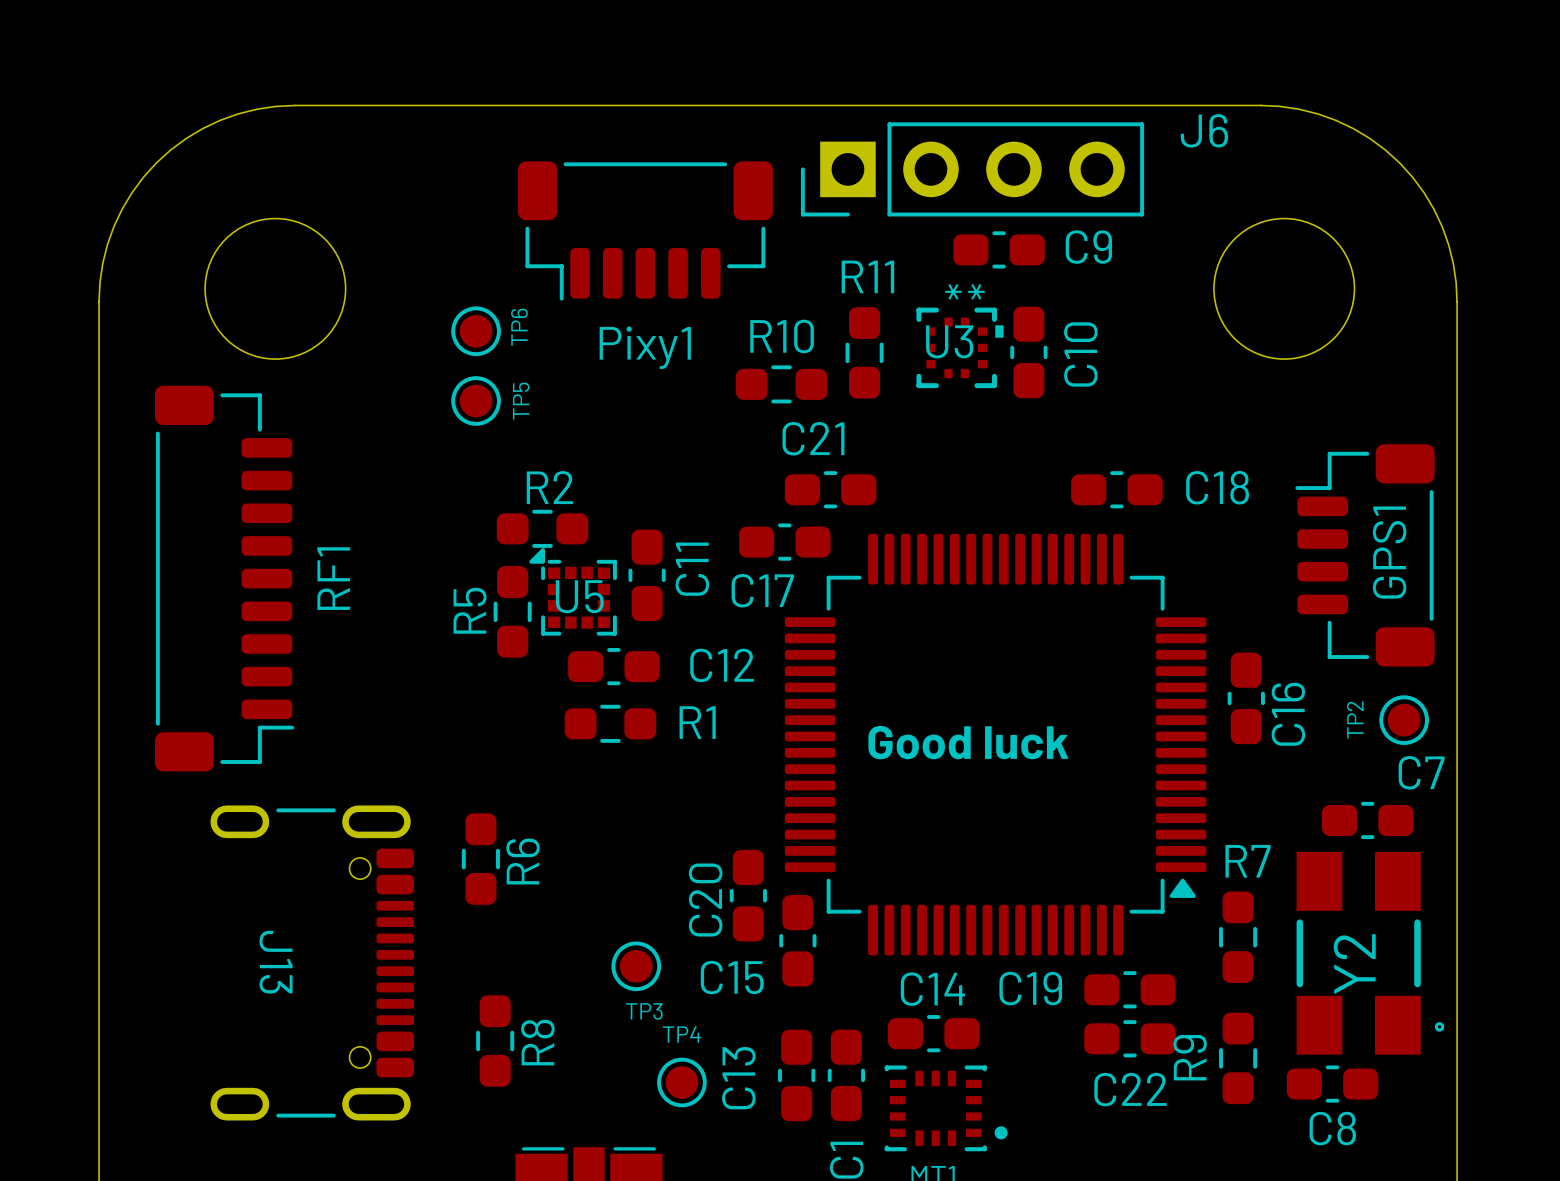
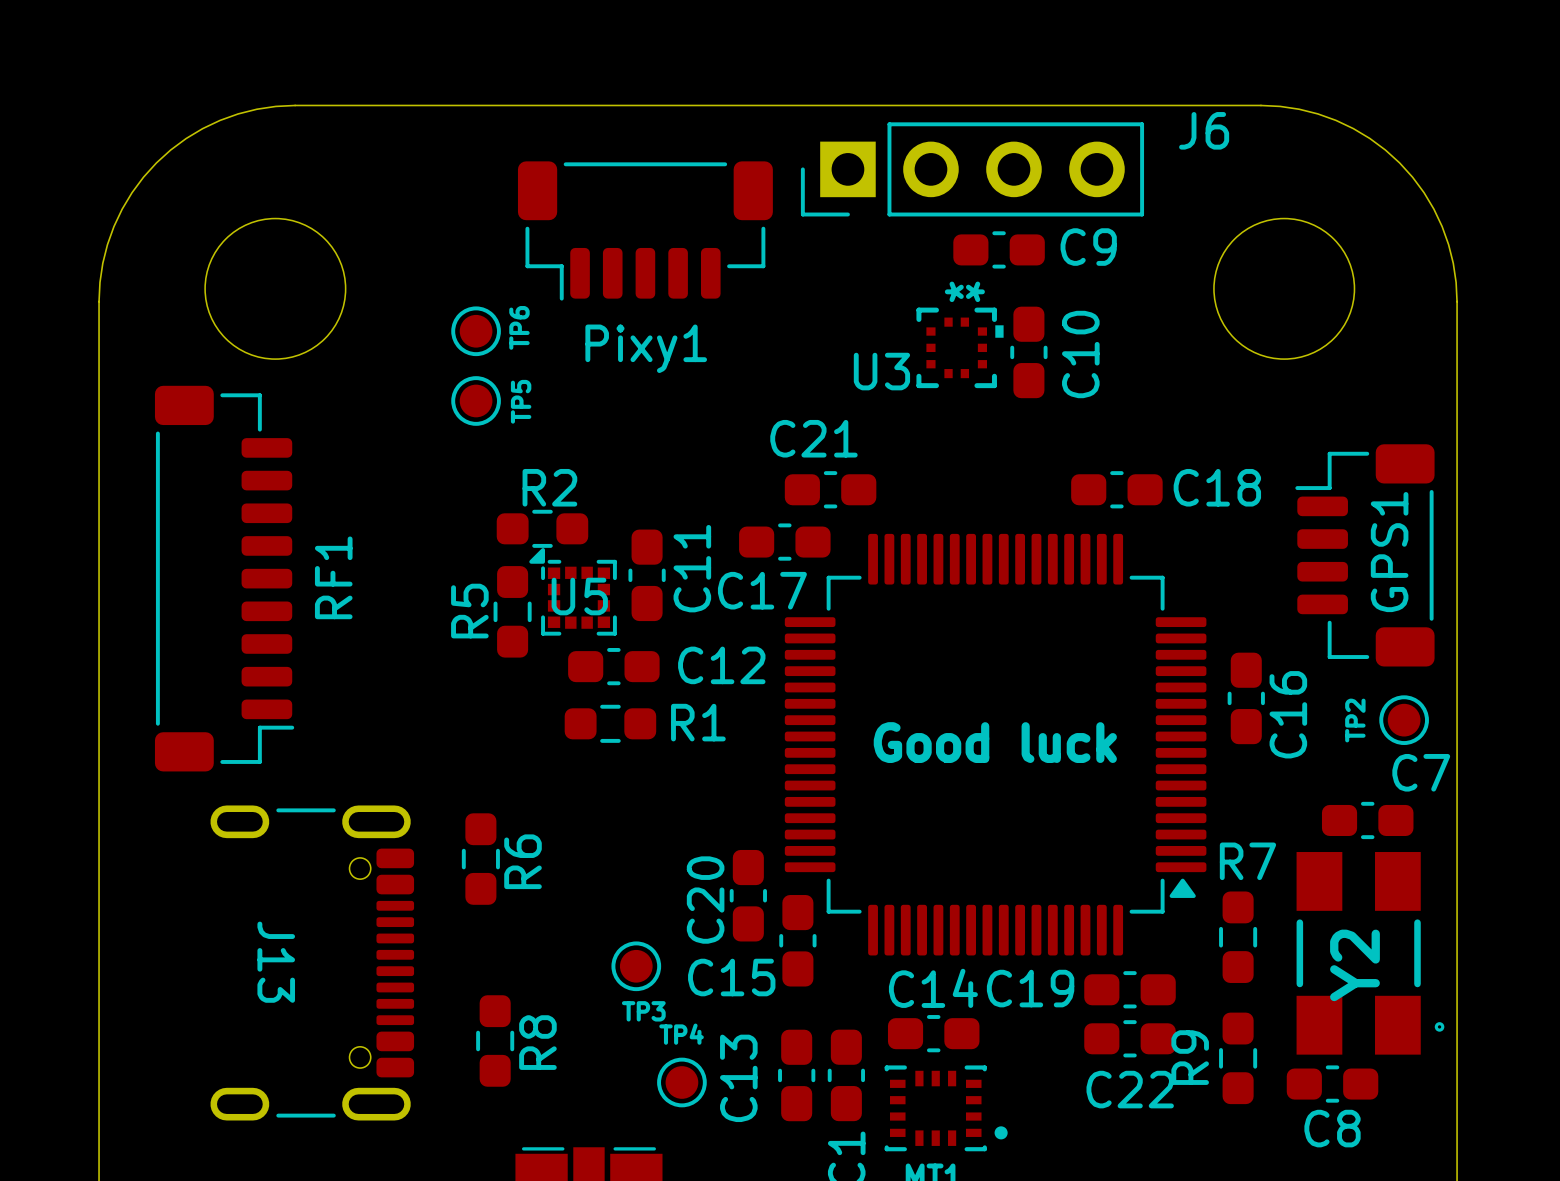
U3 name position: U3 (949, 341) -> U3 (881, 371)
R11: (864, 352) -> none
R10: (781, 384) -> none

